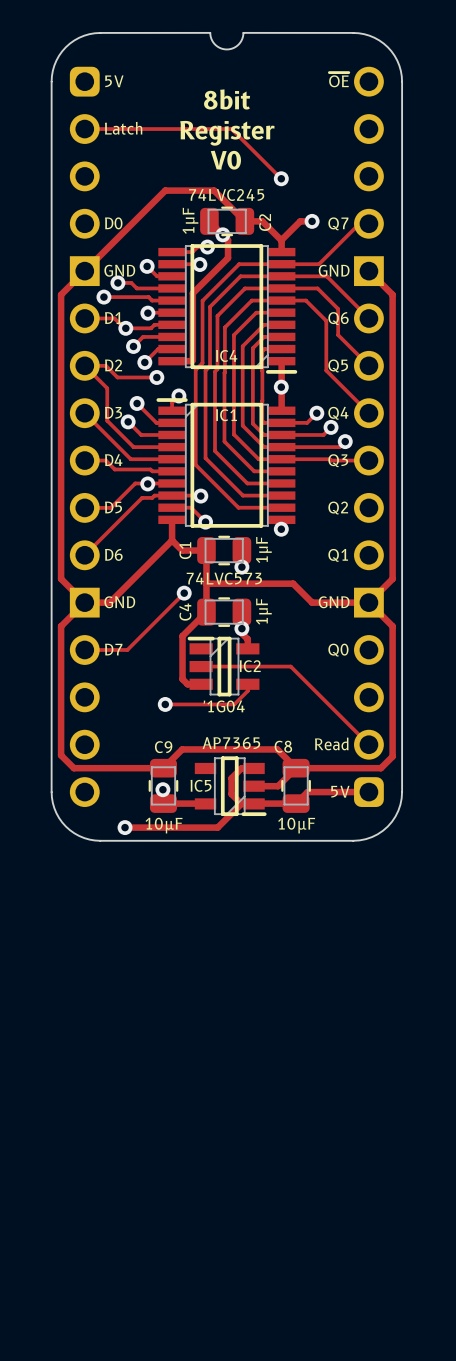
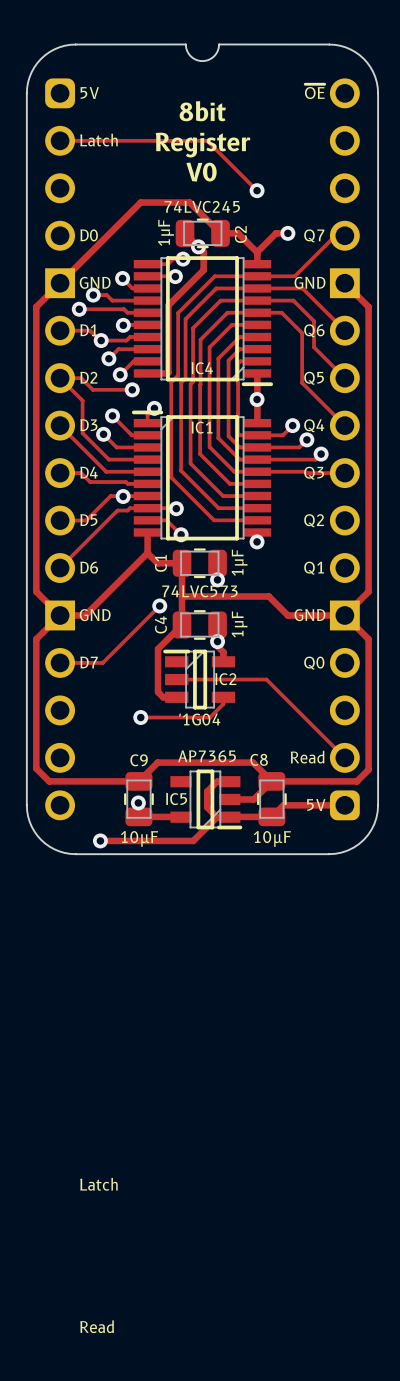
text: none -> Latch (99, 1184)
text: none -> Read (97, 1326)

